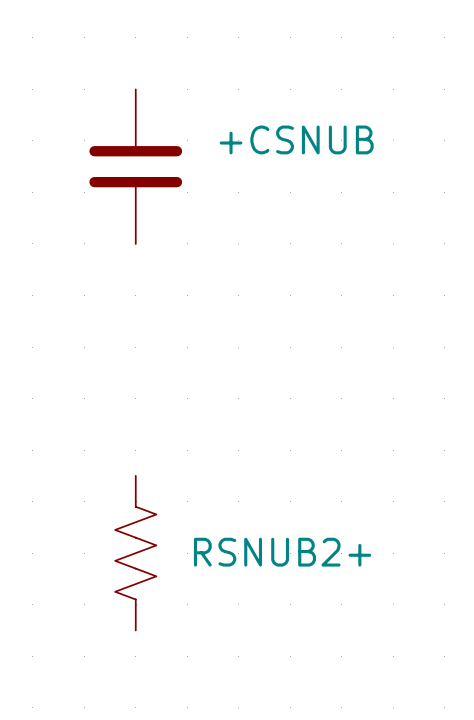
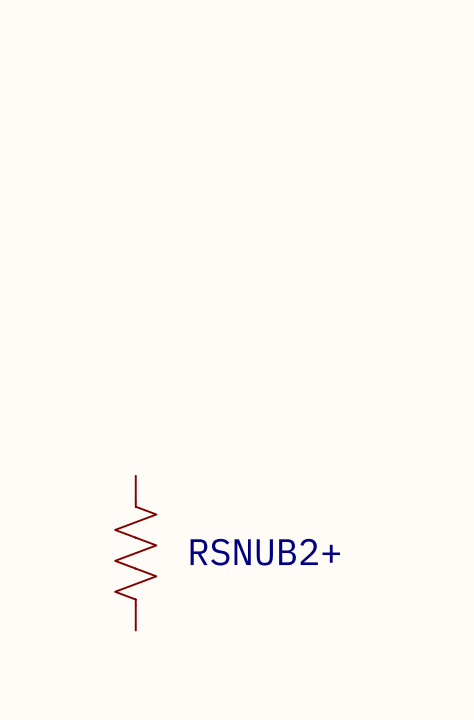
+CSNUB: (135, 166) -> none

